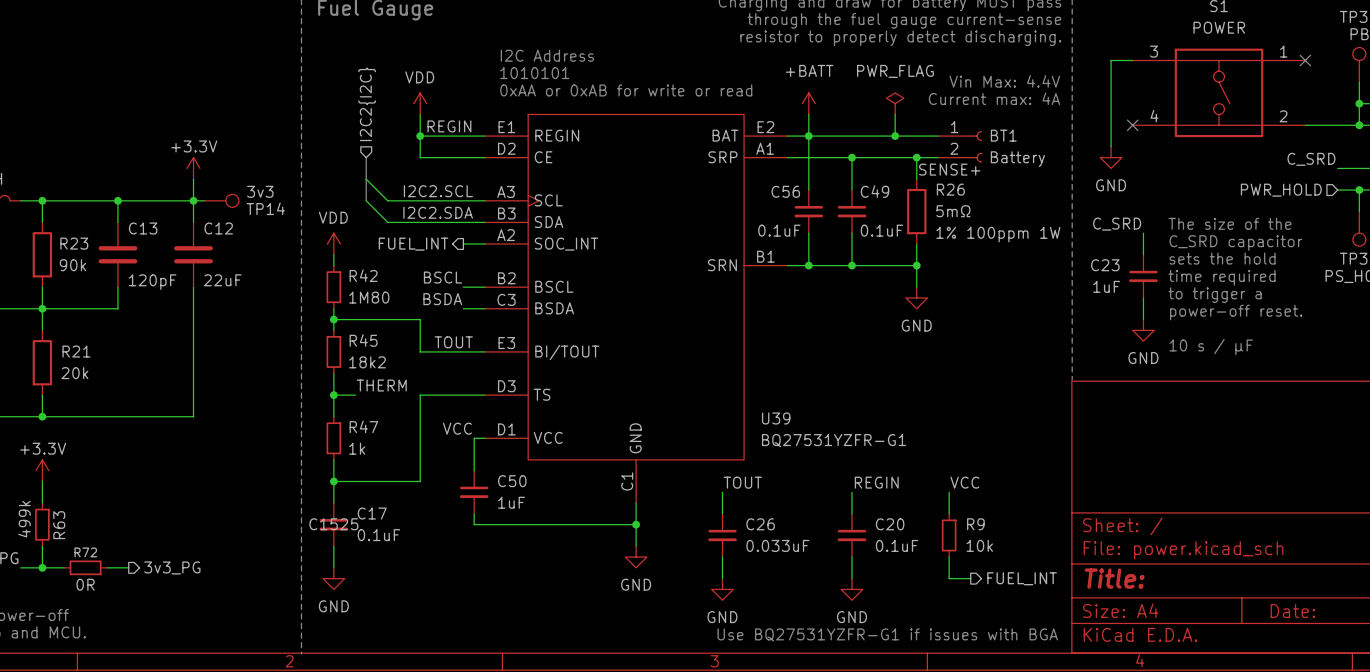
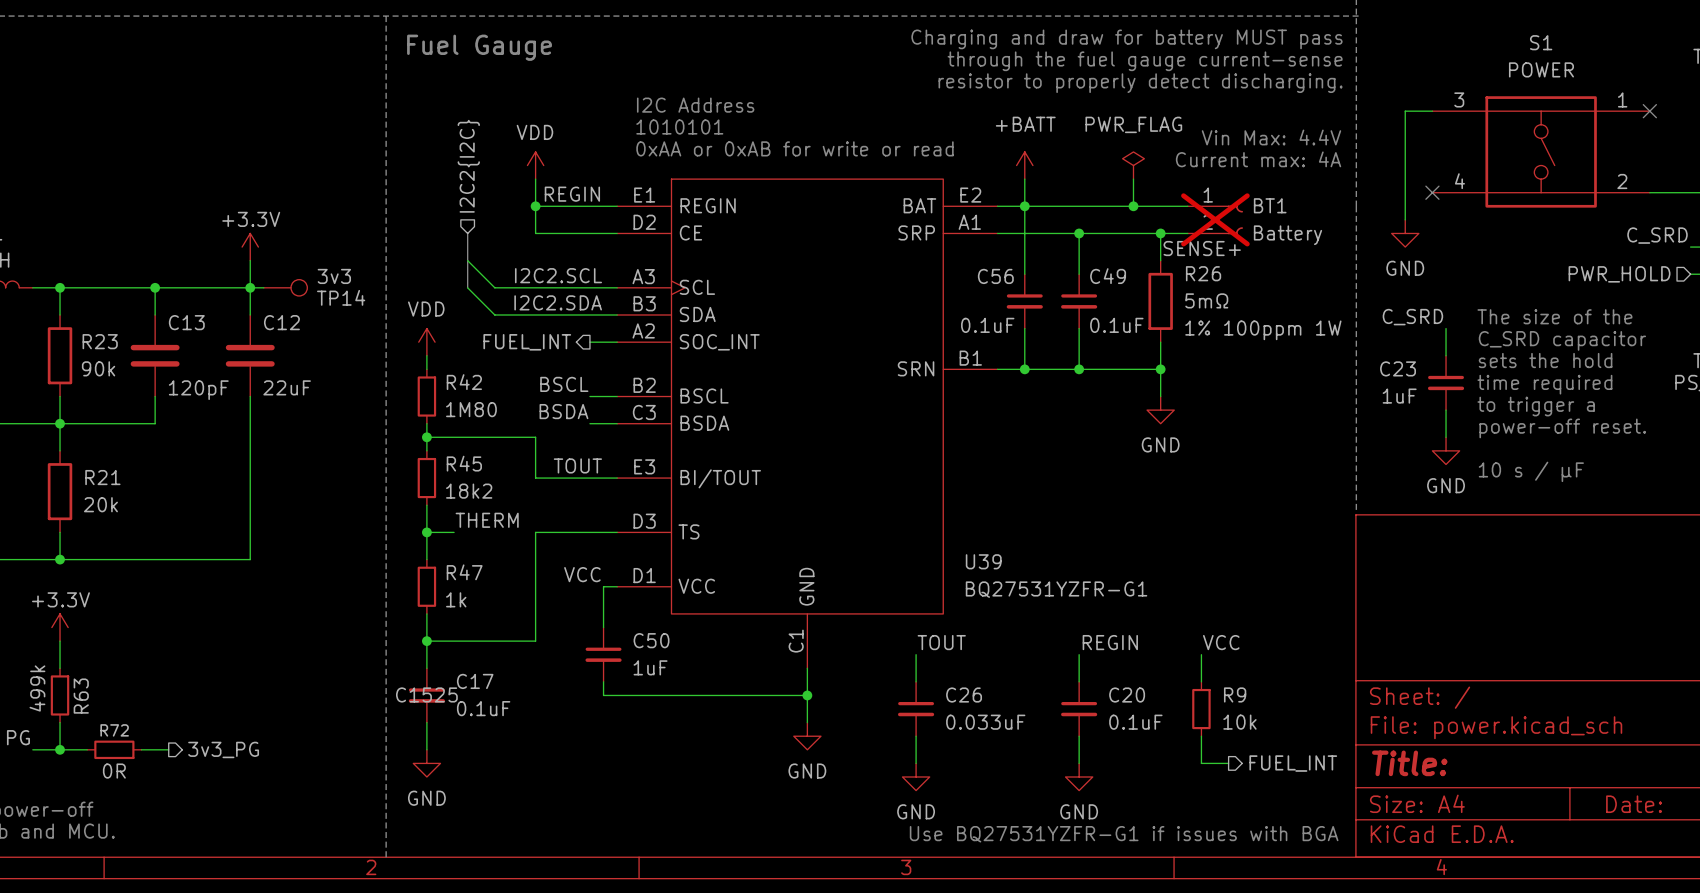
BT1 do-not-place cross: none -> (1215, 219)

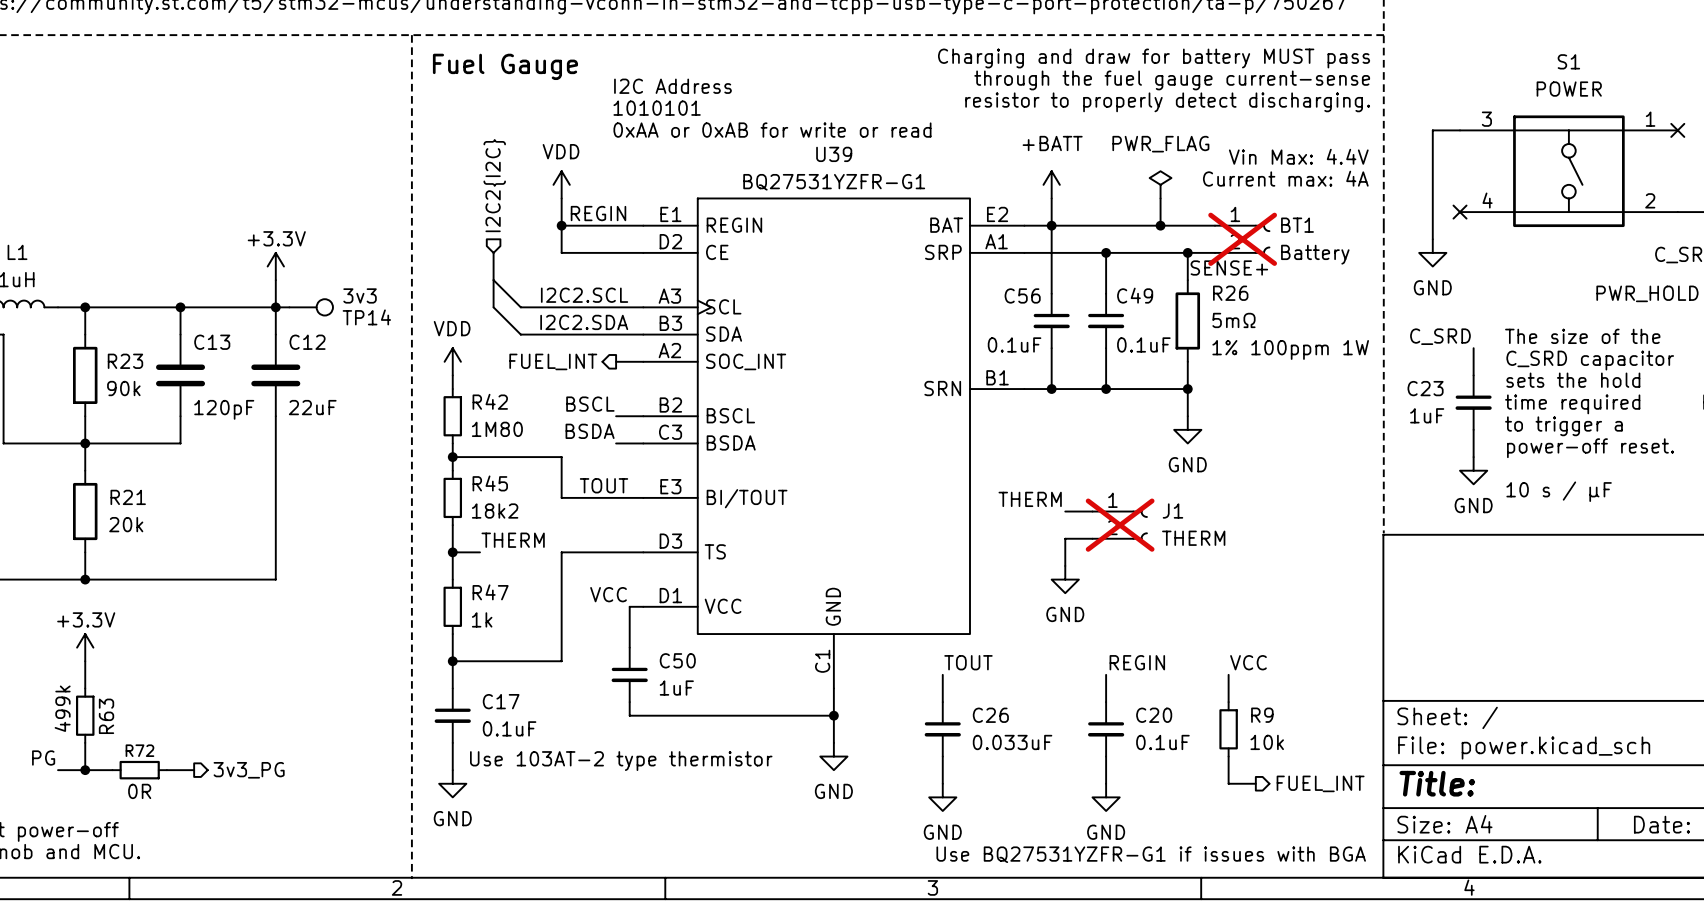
text position: I2C Address (695, 105) -> I2C Address (672, 86)
text position: 1010101 (679, 127) -> 1010101 (657, 108)
text position: 0xAA or 0xAB for write or read (794, 148) -> 0xAA or 0xAB for write or read (772, 130)
label: none -> THERM (1030, 499)
wire: none -> (1065, 511) (1092, 511)
J1: none -> THERM (1120, 525)
wire: none -> (1092, 538) (1065, 538) (1065, 565)
power symbol: none -> GND (1065, 579)
U39 name position: U39 (983, 561) -> U39 (834, 154)
U39 value position: BQ27531YZFR-G1 (1056, 589) -> BQ27531YZFR-G1 (834, 182)
C17 text: C1525 (426, 694) -> none
text: none -> Use 103AT-2 type thermistor (621, 761)

